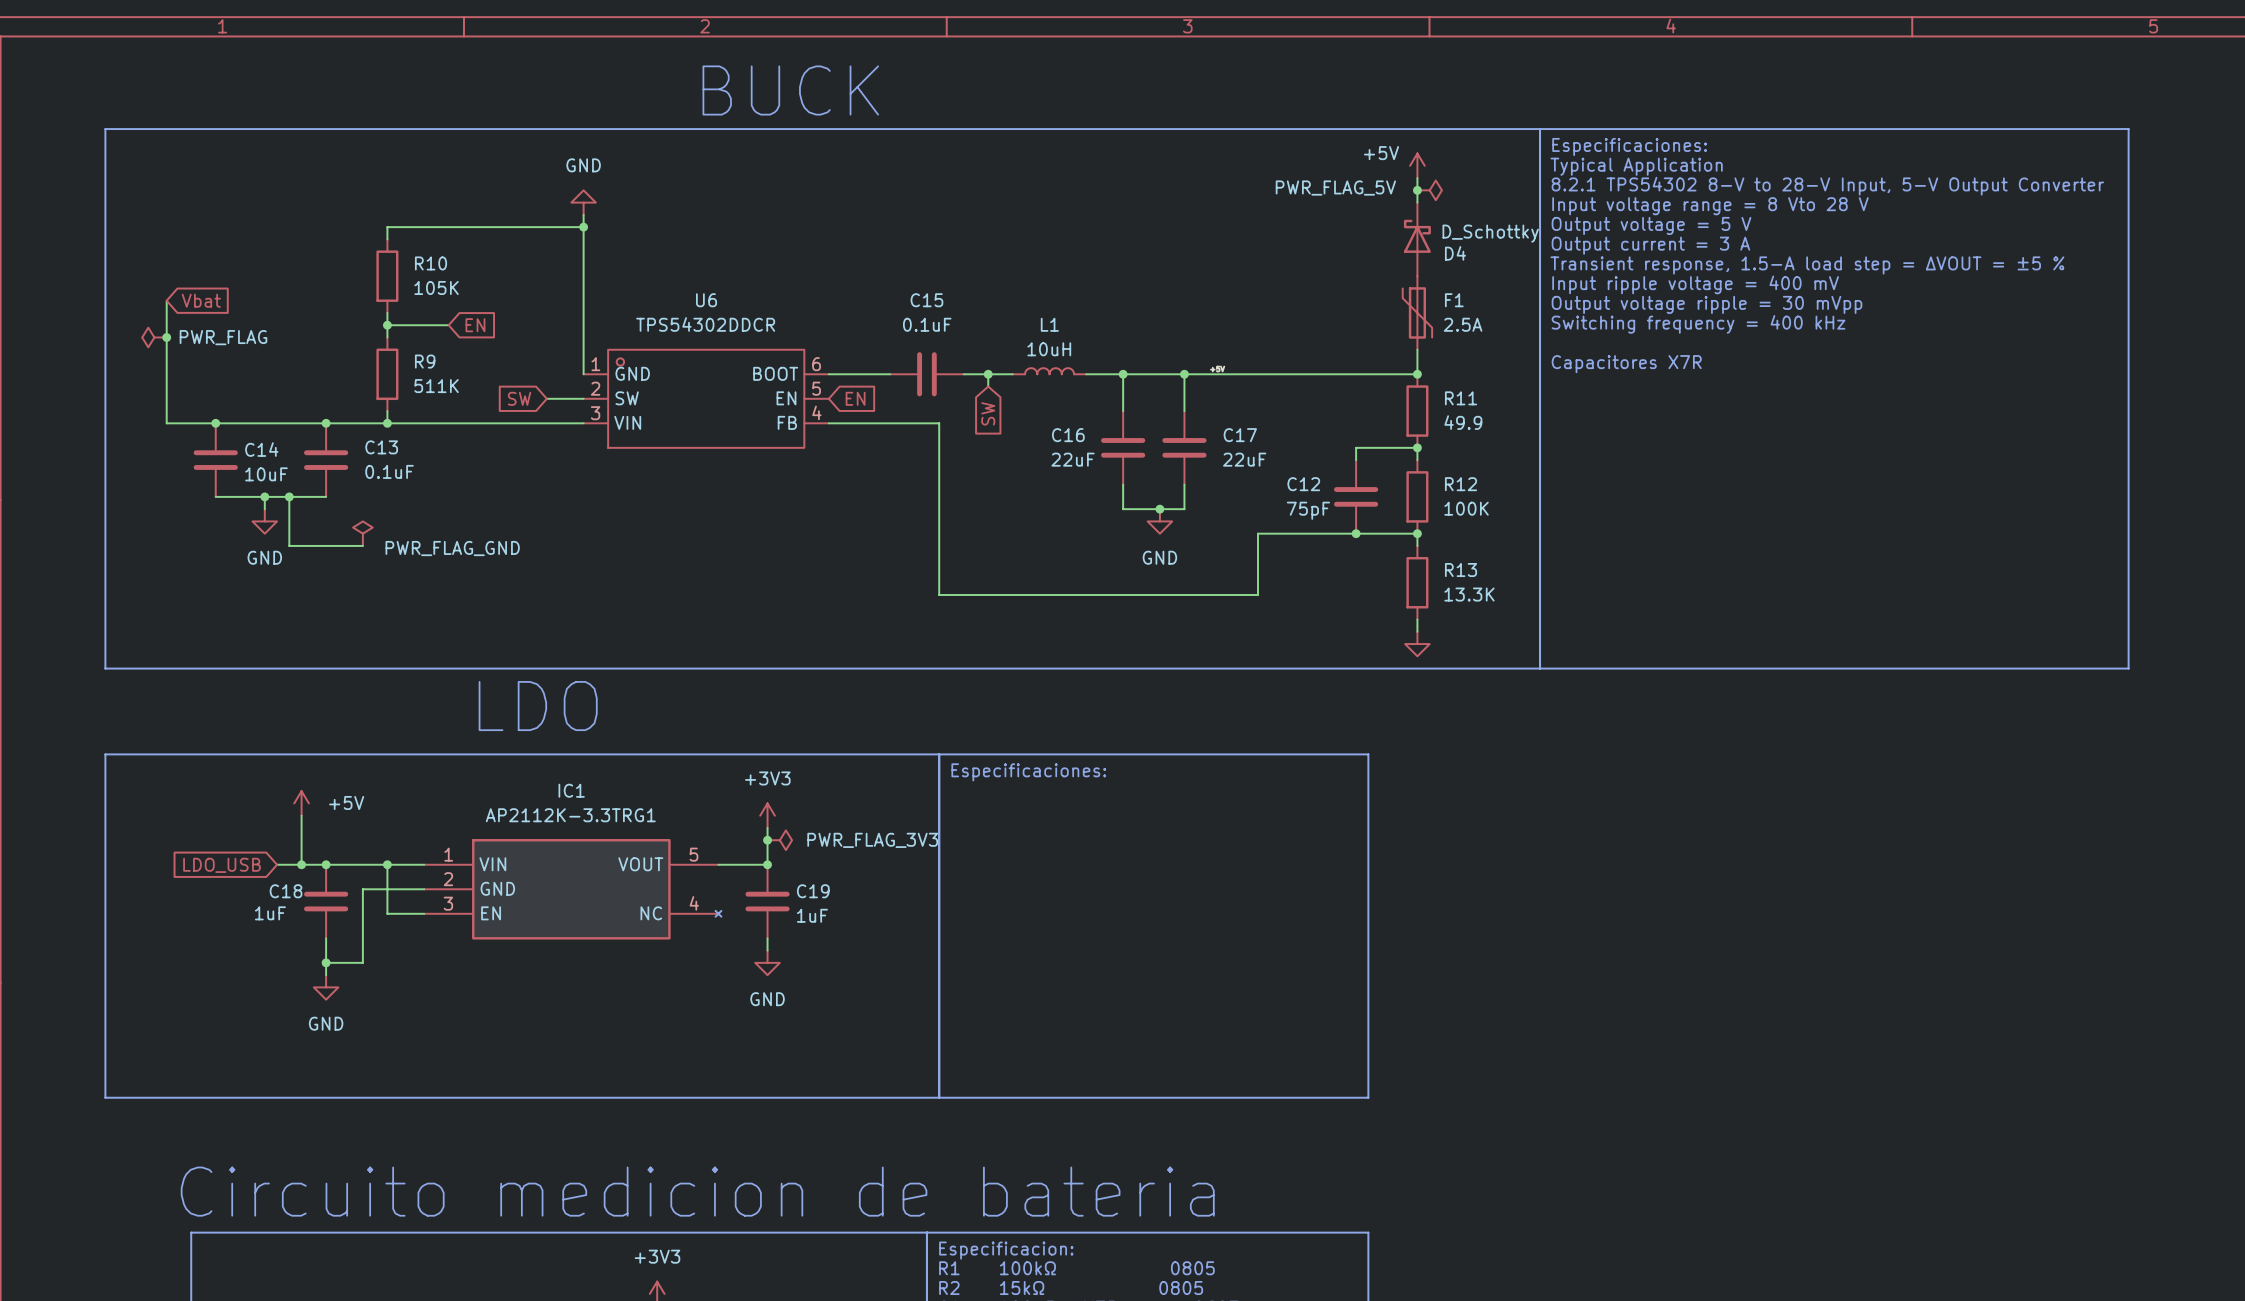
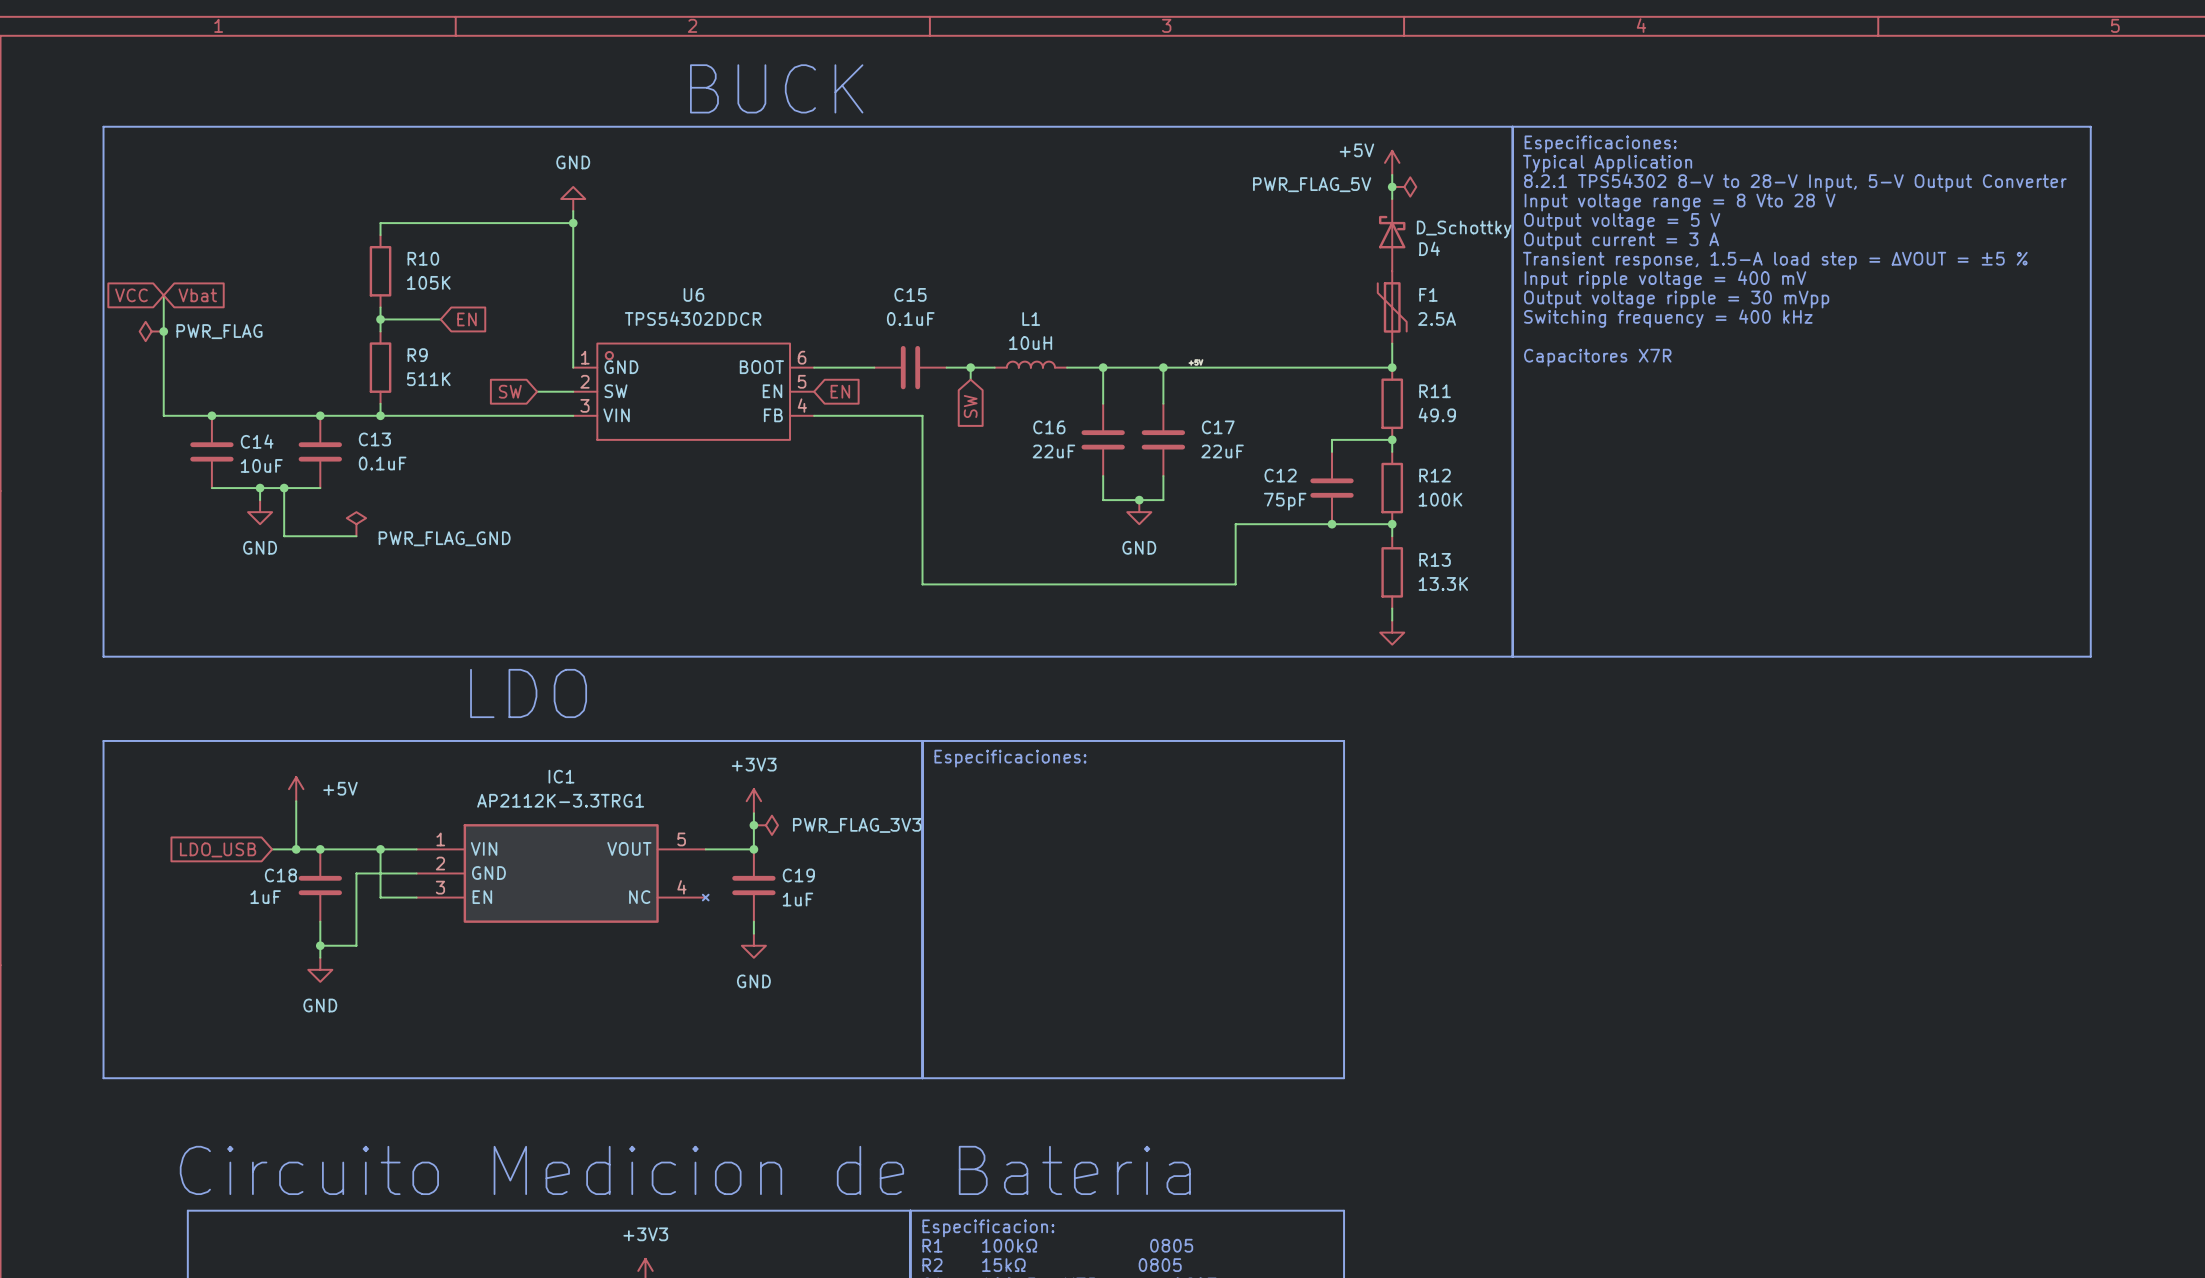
global label: none -> VCC (131, 295)
text: Circuito medicion de bateria (697, 1191) -> Circuito Medicion de Bateria (685, 1170)

